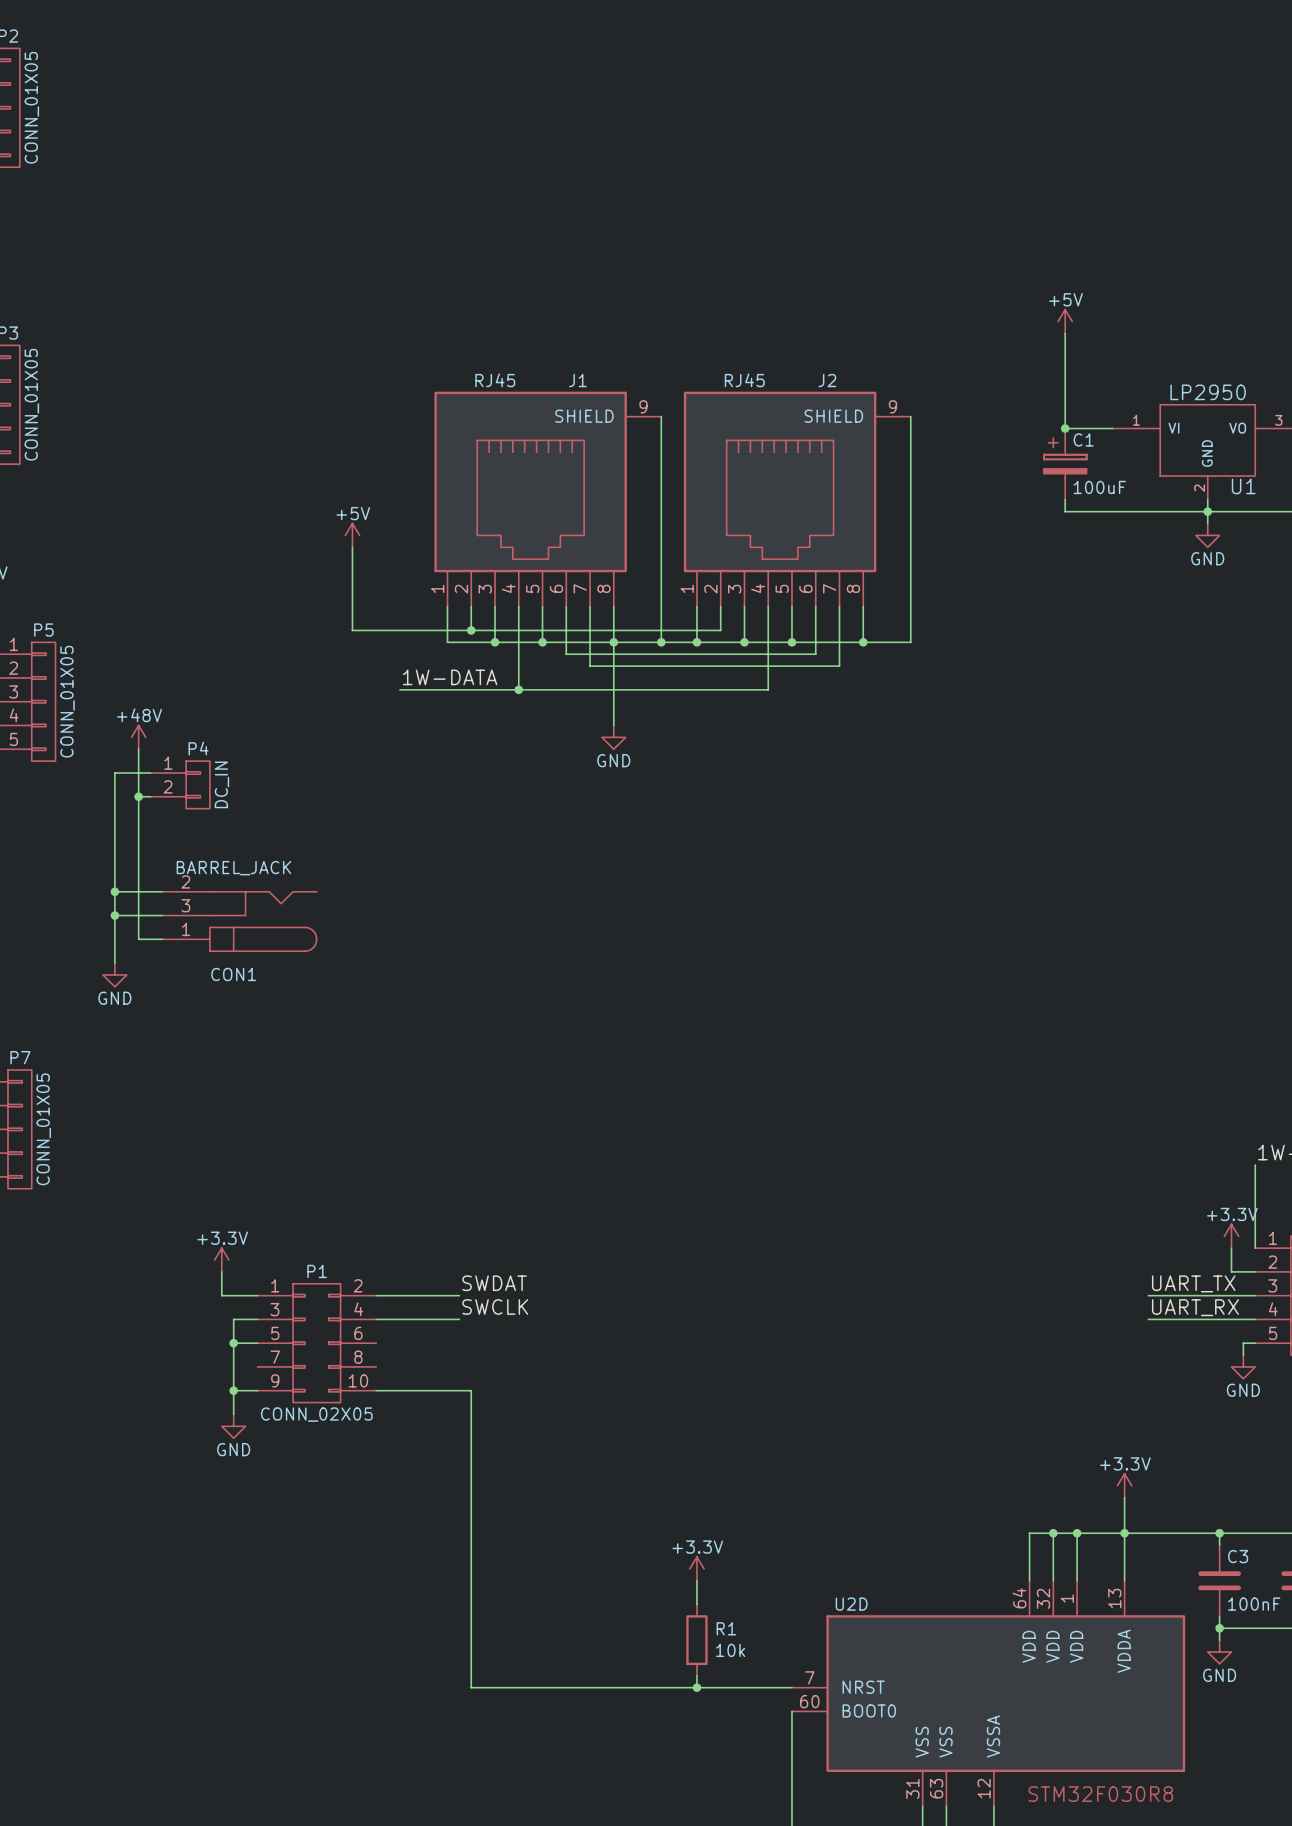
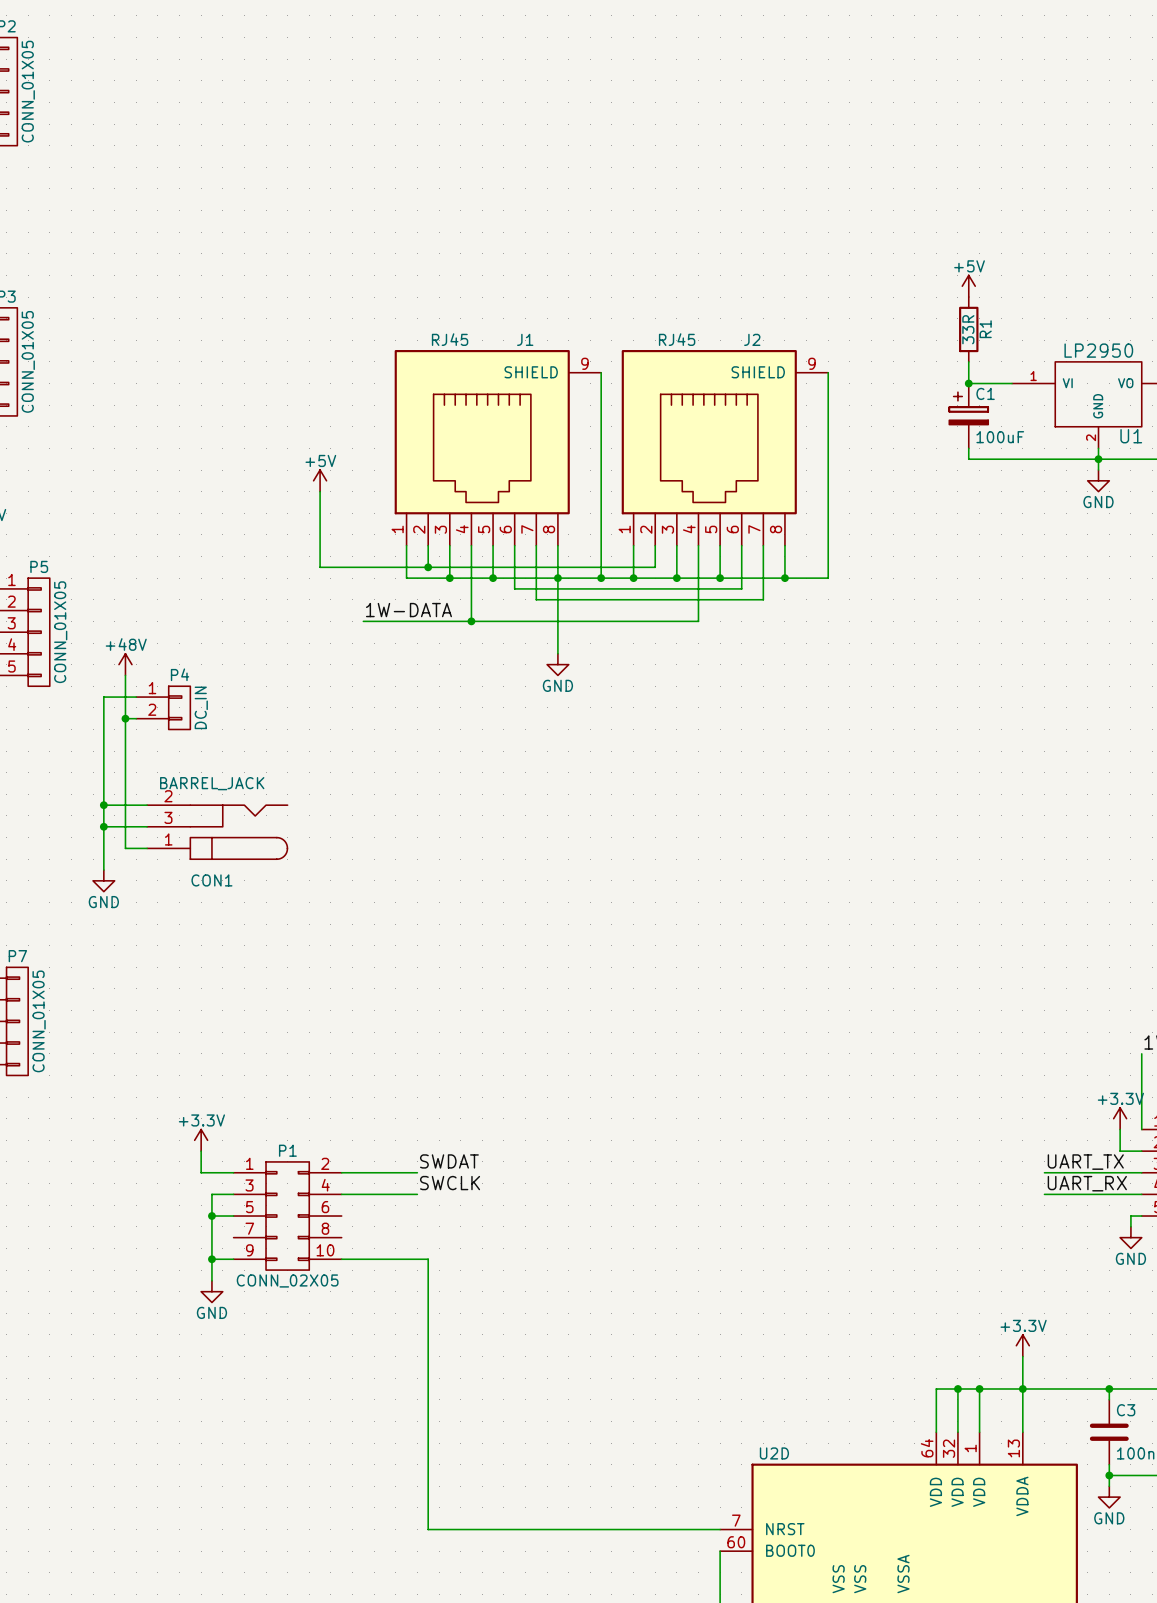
wire: (1065, 333) (1065, 404) -> none
power symbol: +3.3V (696, 1568) -> none
wire: (696, 1580) (696, 1604) -> none
R1 name rotation: 0° (726, 1628) -> 90° counterclockwise (985, 329)
R1 position: (696, 1640) -> (968, 329)
R1 value: 10k (730, 1650) -> 33R (968, 329)
wire: (696, 1675) (696, 1687) -> none
junction: (696, 1687) -> none

